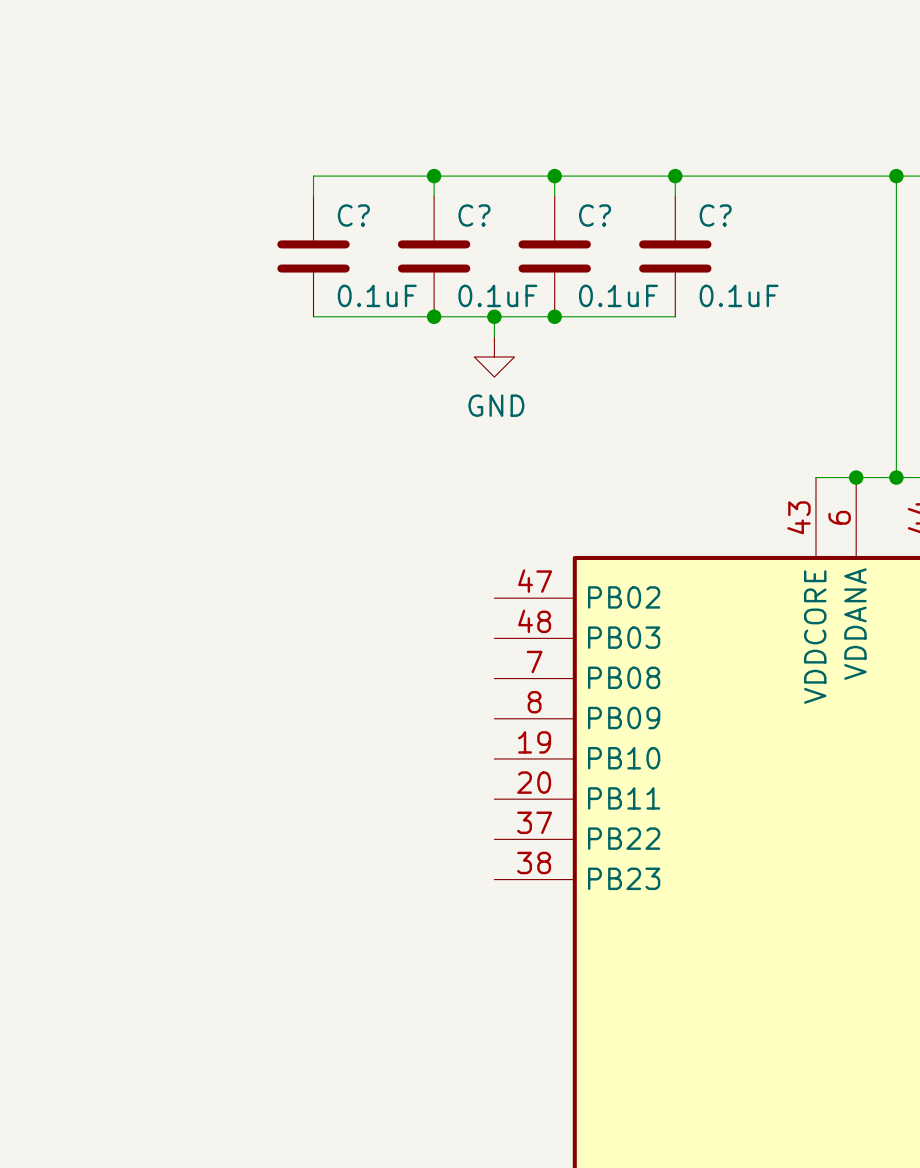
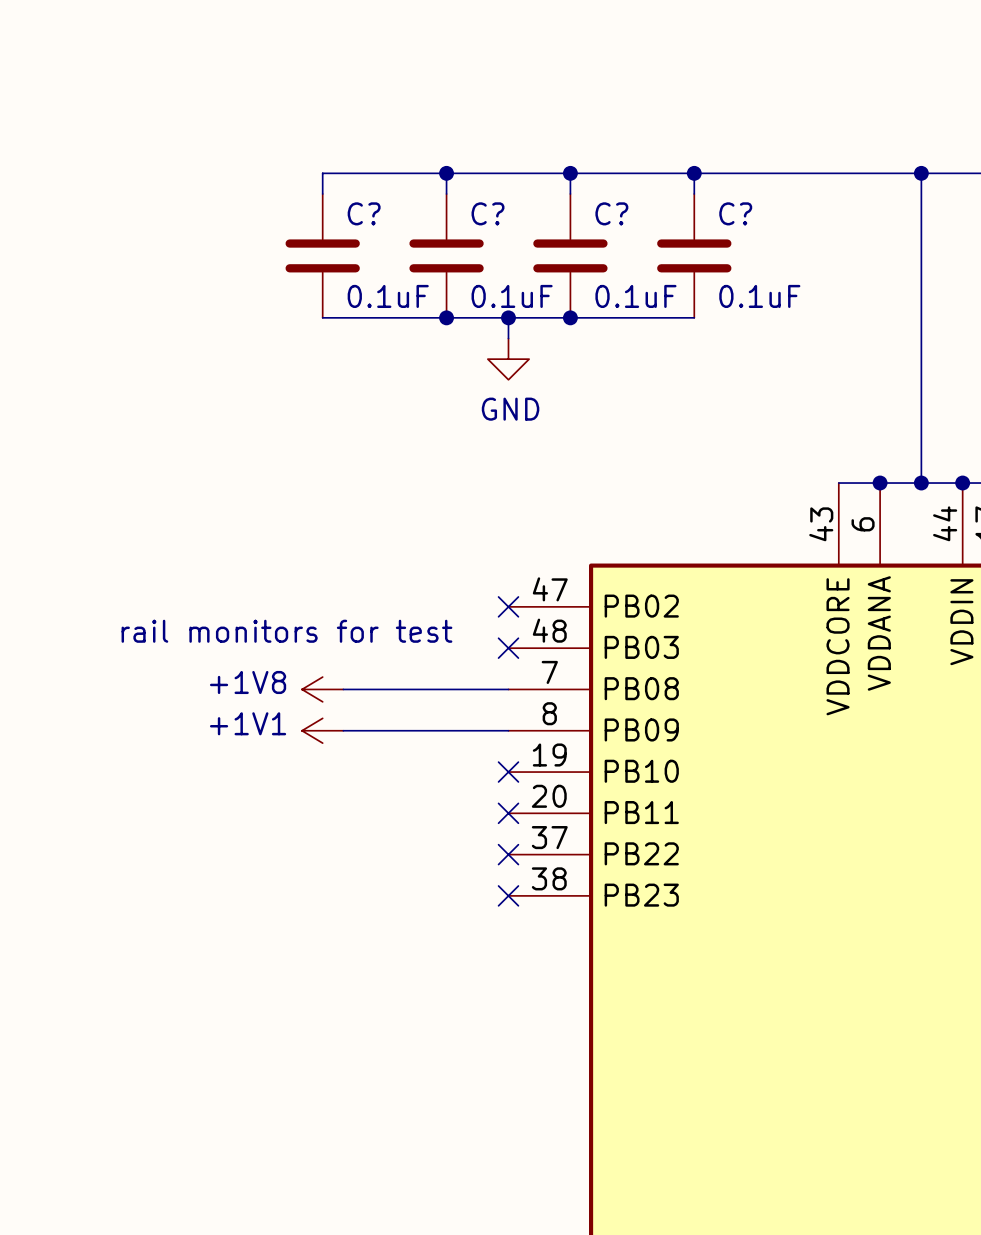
no-connect mark: none -> (508, 606)
text: none -> rail monitors for test (286, 631)
no-connect mark: none -> (508, 648)
power symbol: none -> +1V8 (322, 689)
wire: none -> (343, 689) (508, 689)
power symbol: none -> +1V1 (322, 730)
wire: none -> (343, 730) (508, 730)
no-connect mark: none -> (508, 772)
no-connect mark: none -> (508, 813)
no-connect mark: none -> (508, 854)
no-connect mark: none -> (508, 895)

